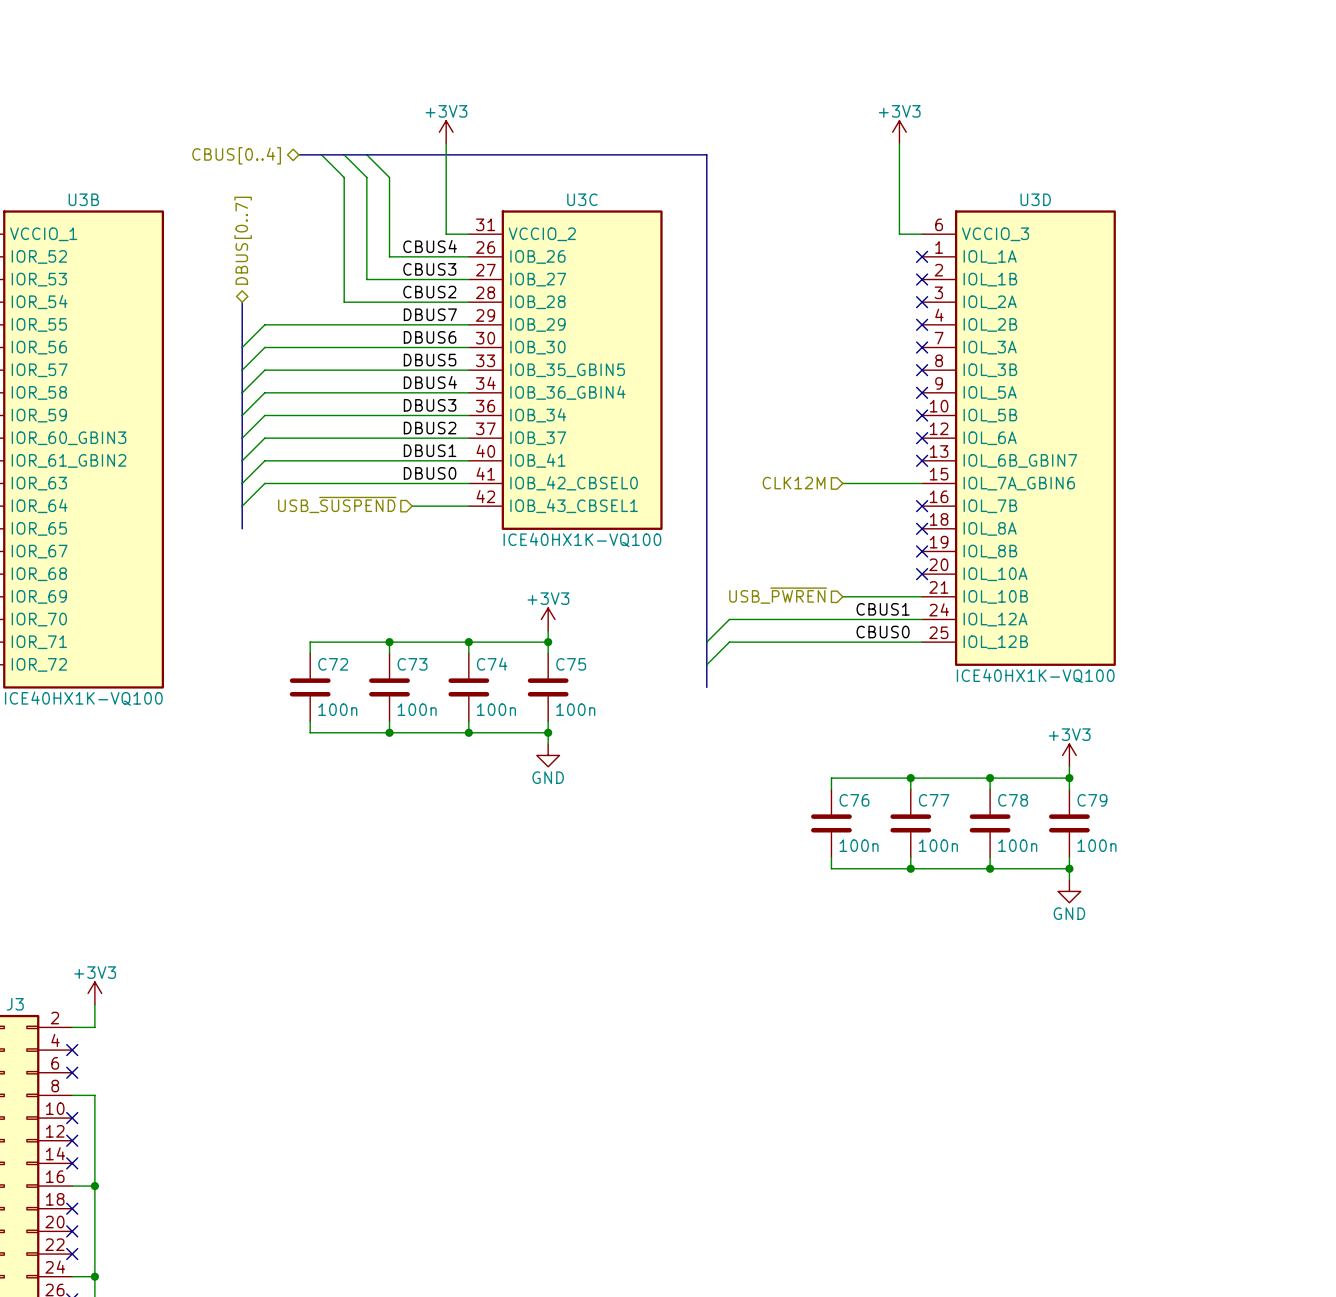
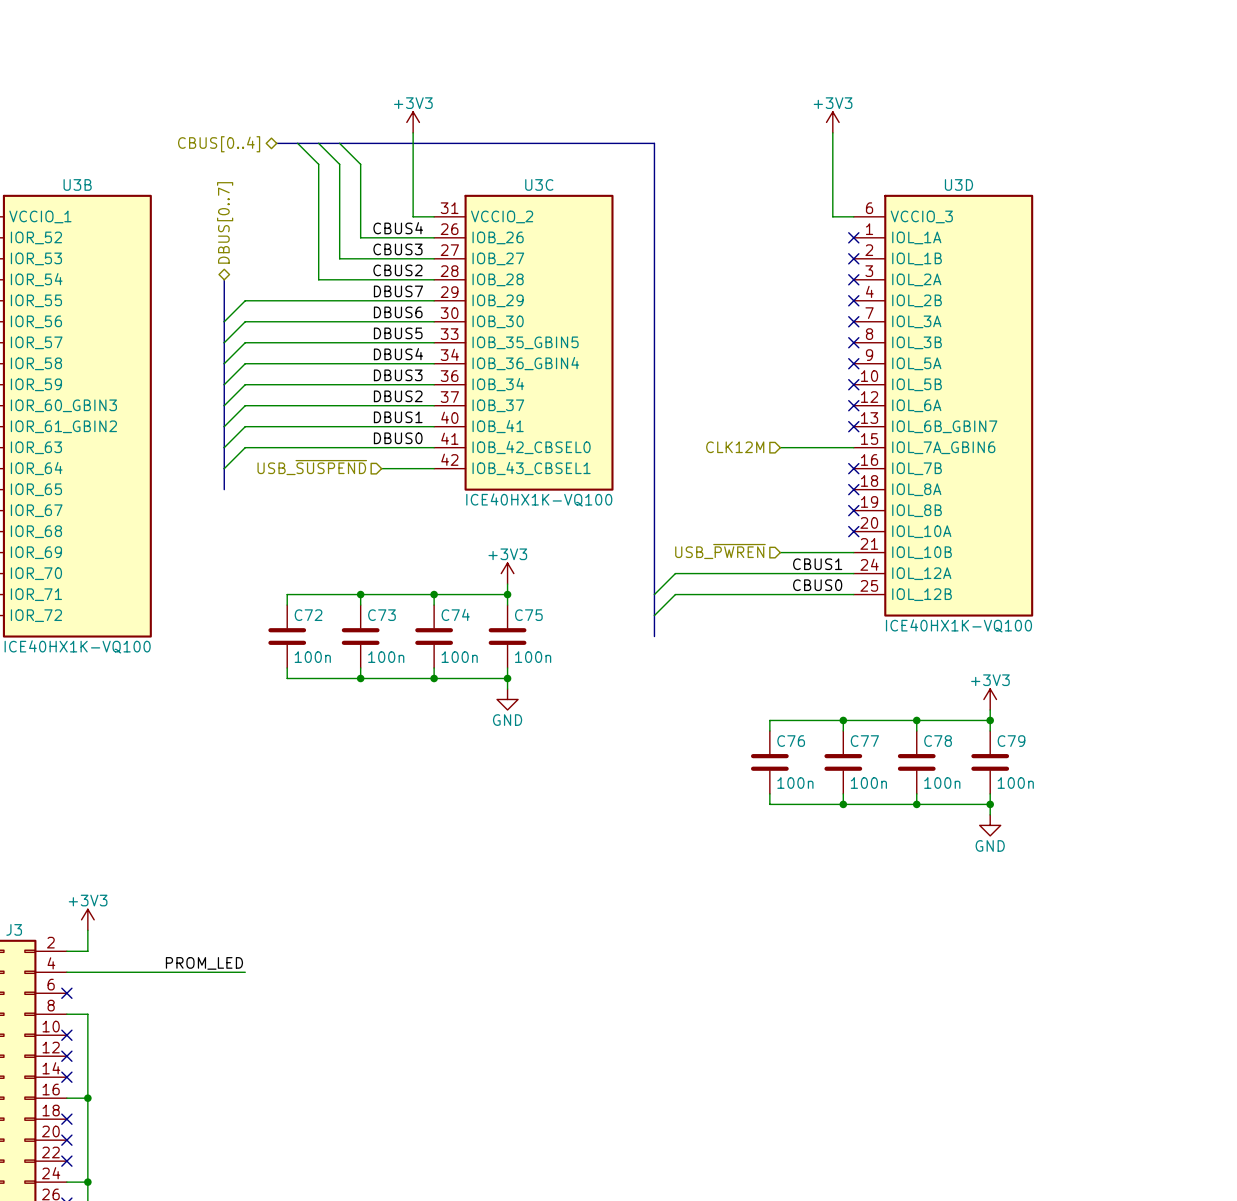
label: none -> PROM_LED (204, 963)
wire: none -> (66, 972) (245, 972)
no-connect mark: (72, 1050) -> none

